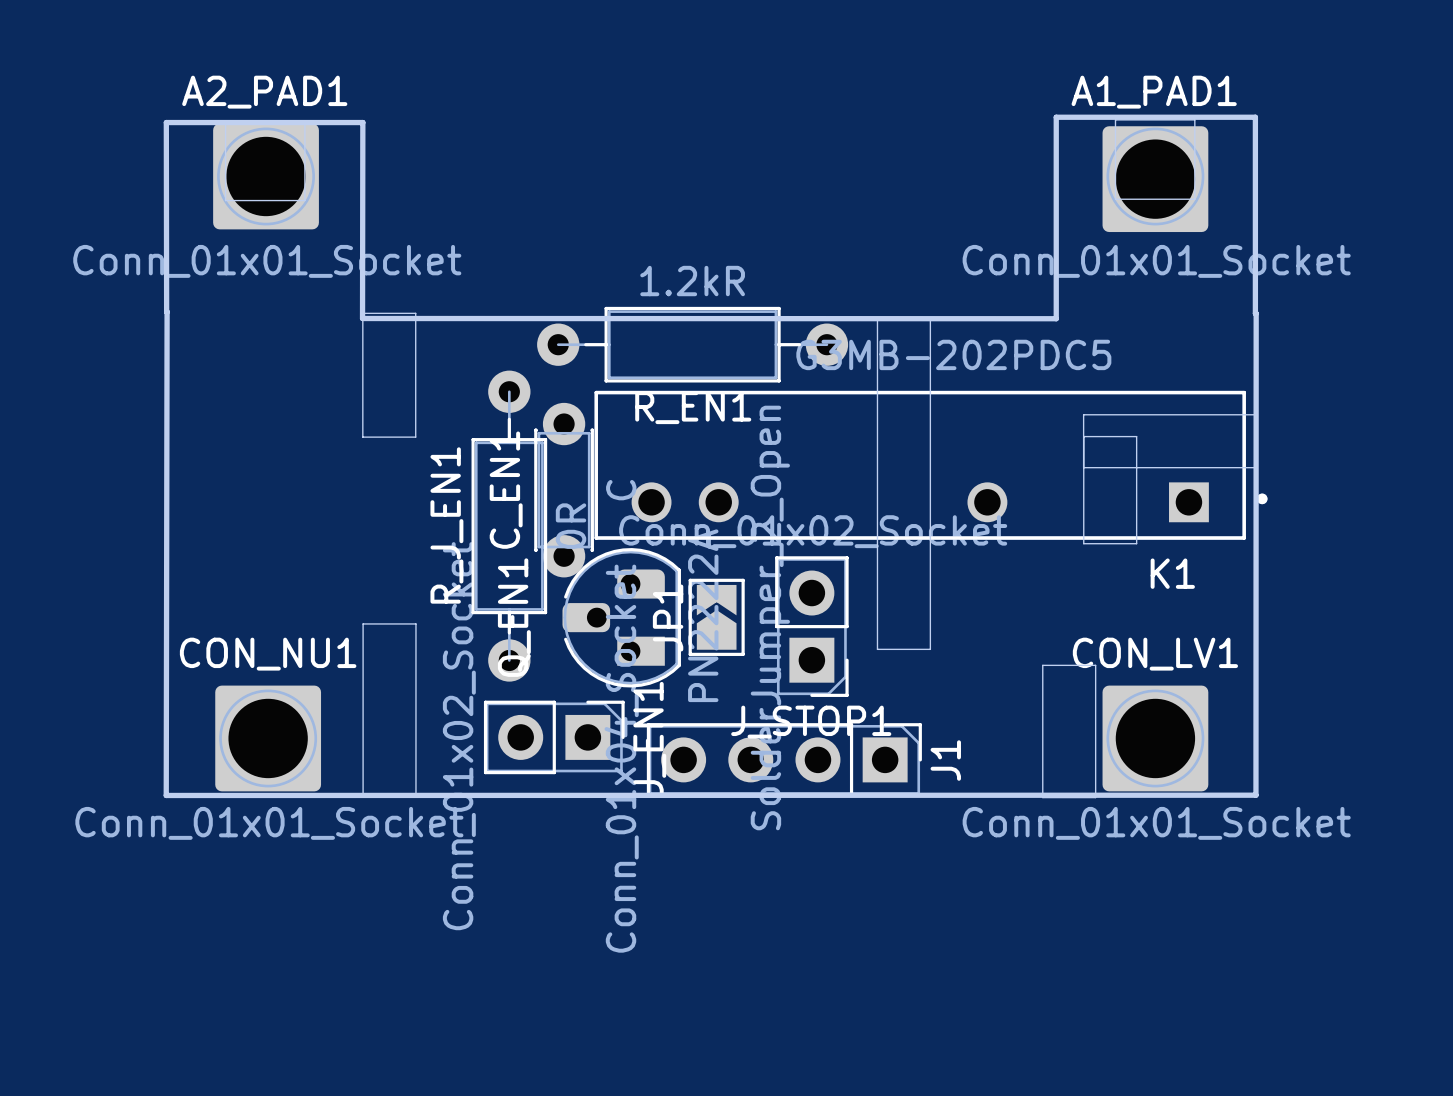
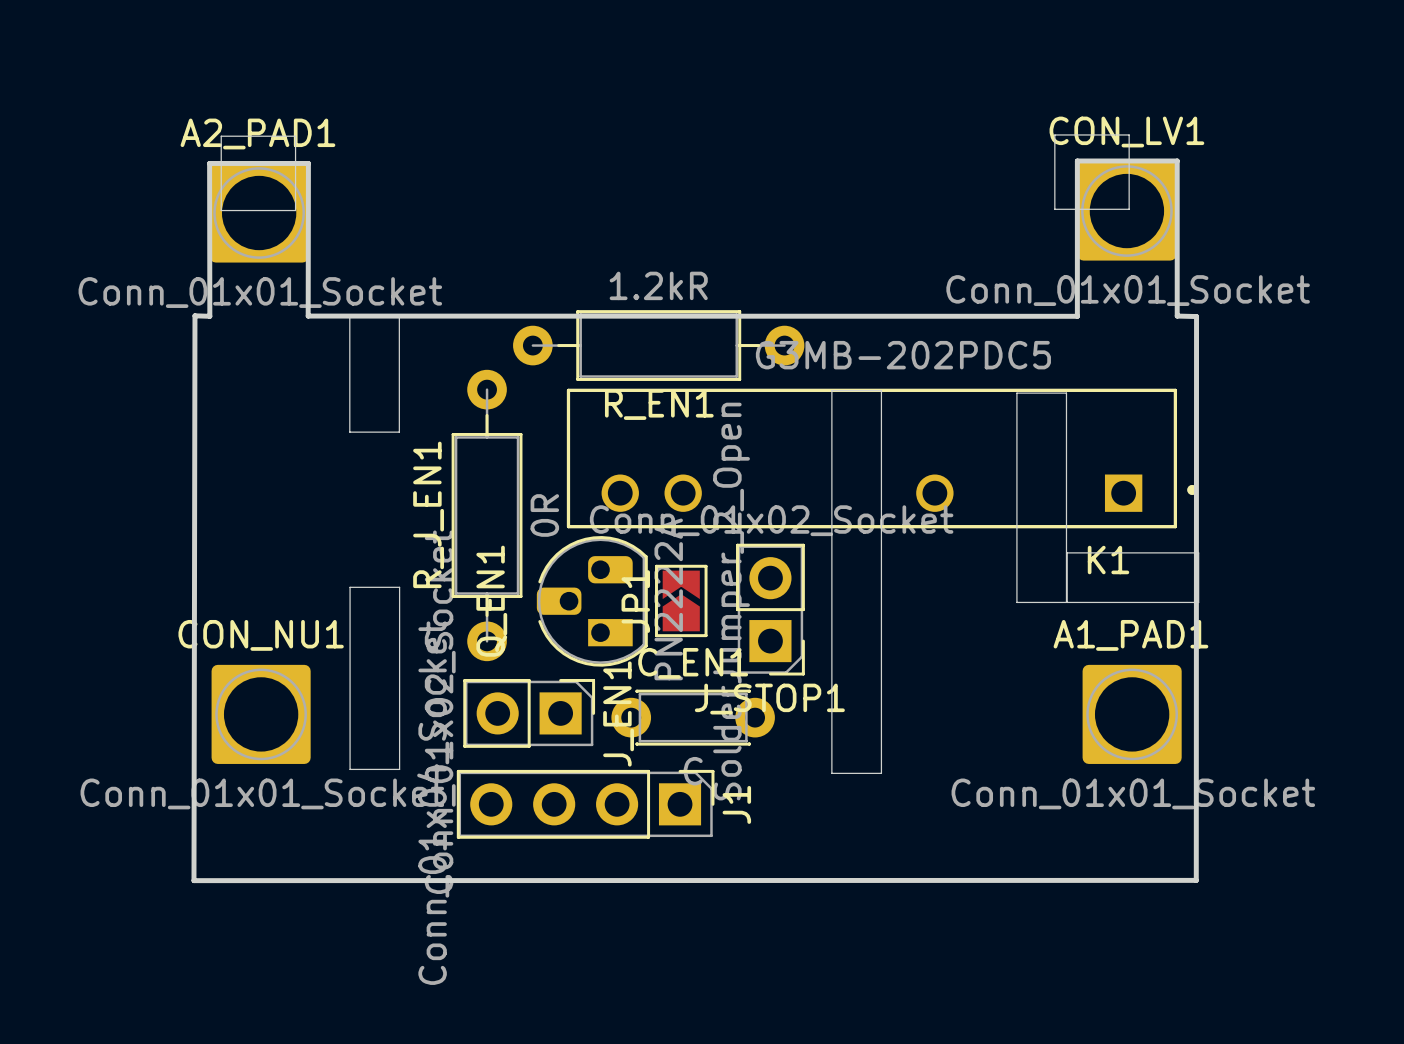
A1_PAD1 footprint: [1102, 126, 1209, 233] -> [1082, 664, 1182, 764]
A2_PAD1 position: (266, 176) -> (259, 213)
board edge: (166, 311) (166, 122) (362, 122) (362, 318) (1056, 318) (1056, 117) (1255, 117) (1255, 313) -> none
board edge: (167, 311) (166, 795) (1255, 795) (1256, 313) -> (1185, 316) (1177, 316) (1177, 160) (1077, 160) (1077, 316) (308, 316) (308, 163) (209, 163) (209, 316) (194, 315) (193, 880) (1196, 880) (1196, 316) (1186, 316)
board edge: (877, 392) (877, 318) (930, 318) (930, 392) -> (831, 390) (881, 390)
board edge: none -> (1016, 393) (1066, 393) (1066, 602) (1016, 602) (1016, 393)
board edge: (1083, 414) (1257, 414) (1257, 467) (1083, 467) (1083, 414) -> none
board edge: (1083, 436) (1136, 436) (1136, 543) (1083, 543) (1083, 436) -> none
C_EN1 rotation: 0° (564, 490) -> 90° clockwise (693, 717)
C_EN1 position: (564, 490) -> (693, 717)
board edge: none -> (1067, 552) (1198, 552) (1198, 602) (1067, 602) (1067, 552)
board edge: (363, 623) (415, 623) -> (350, 607) (350, 587) (399, 587) (399, 607)
board edge: (877, 649) (930, 649) -> (831, 630) (831, 773) (881, 773) (881, 630)
board edge: (1042, 665) (1095, 665) (1095, 797) (1042, 797) (1042, 665) -> none
CON_LV1 position: (1155, 738) -> (1126, 211)
J1 position: (784, 759) -> (585, 804)

